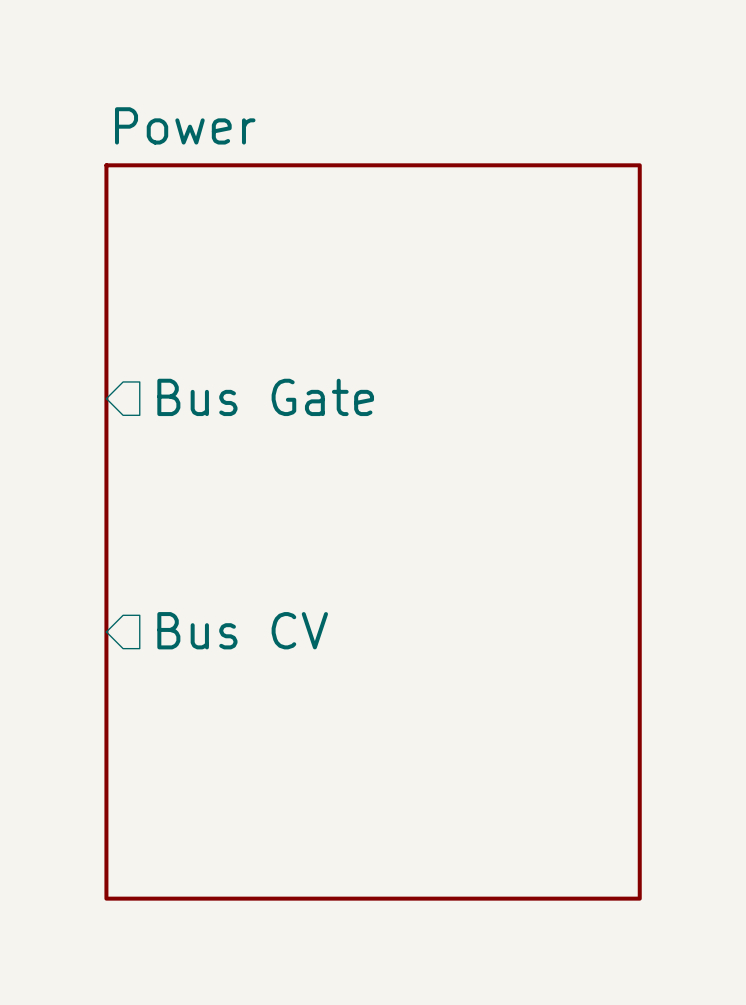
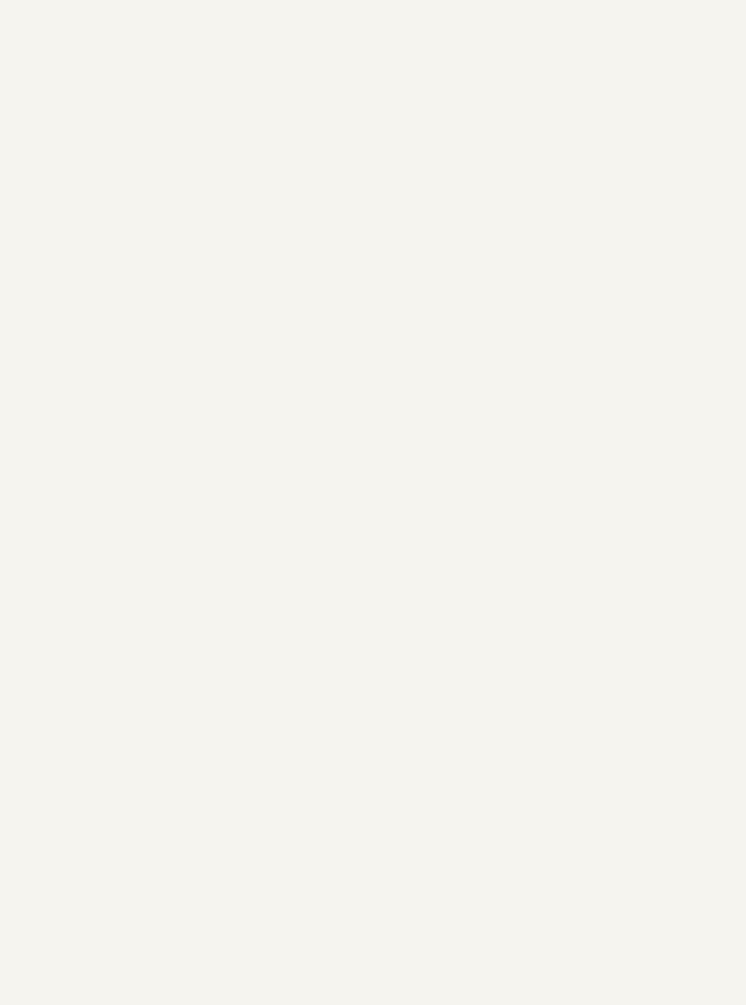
sheet pin: Bus Gate (265, 397) -> none
sheet Power: (373, 531) -> none
sheet pin: Bus CV (242, 630) -> none

